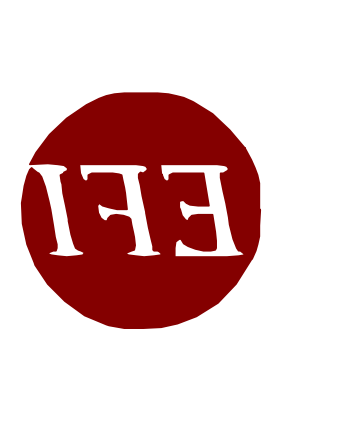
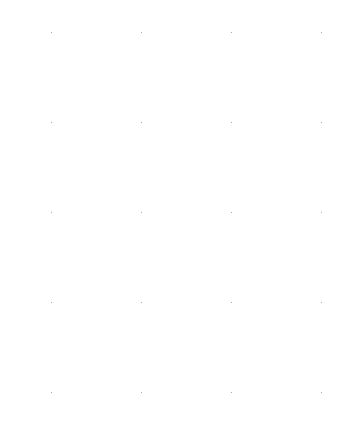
part: (140, 210) -> none

